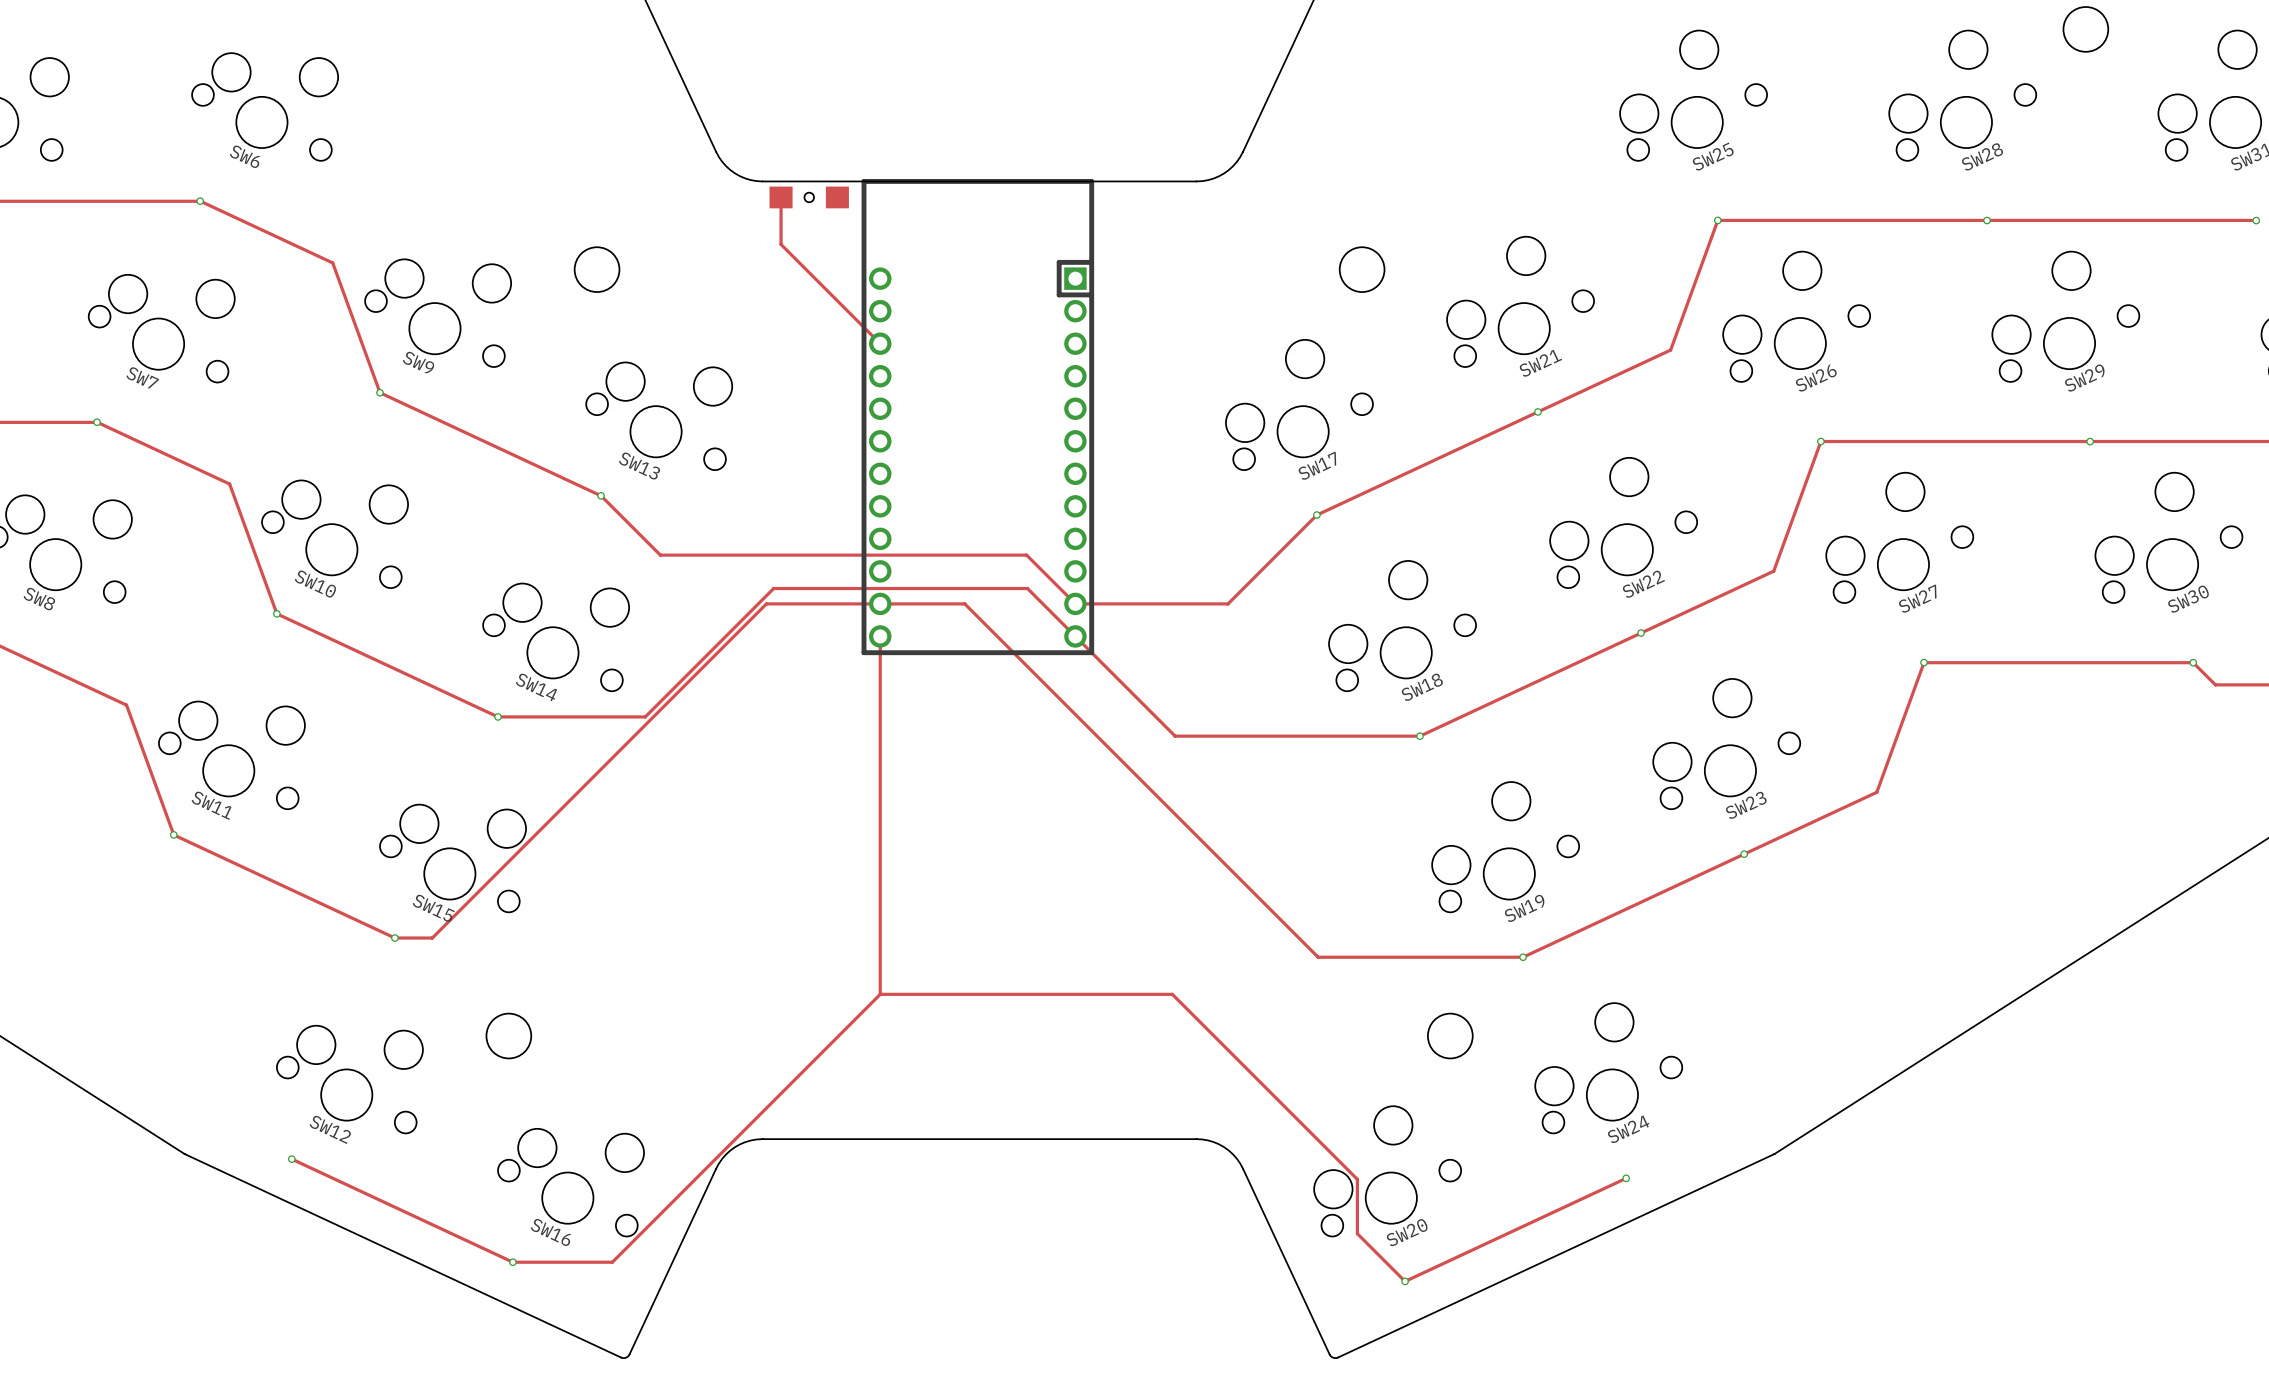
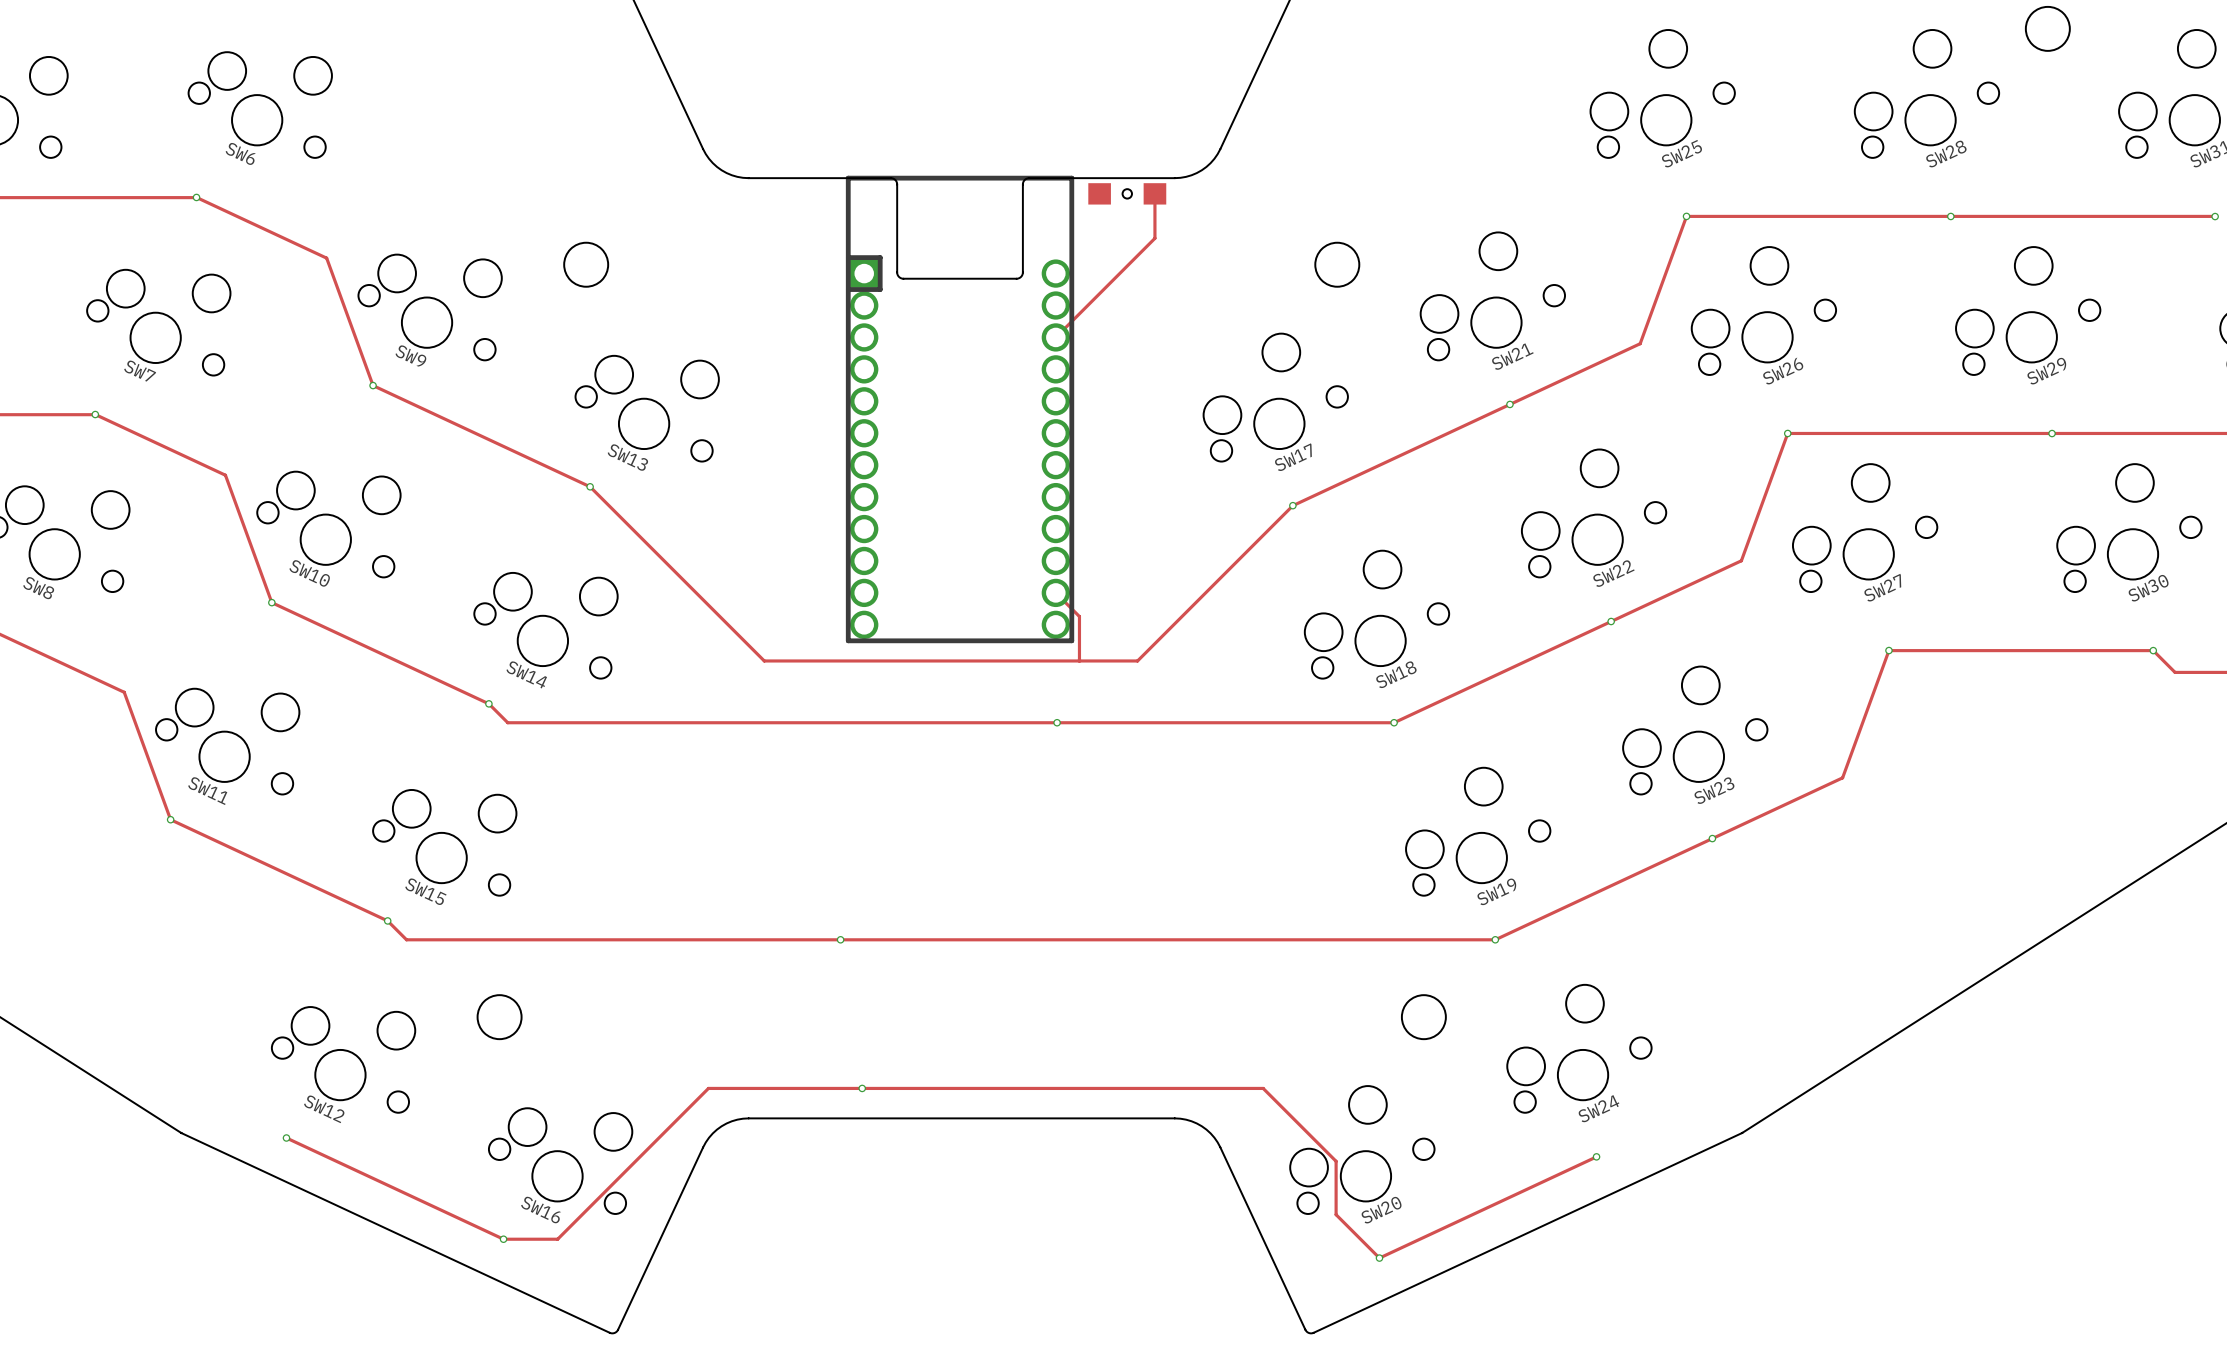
part footprint: [861, 179, 1095, 656] -> [845, 175, 1075, 644]
board edge: (907, 181) (1048, 181) -> (890, 178) (895, 179) (897, 183) (897, 273) (899, 276) (903, 278) (1020, 277) (1022, 272) (1022, 183) (1024, 179) (1029, 178)
track: (781, 197) (781, 244) (880, 343) -> none
part: (809, 197) -> none
part: none -> (1127, 193)
track: none -> (1154, 193) (1154, 238) (1055, 337)
track: (601, 495) (660, 555) (1026, 555) (1075, 603) (1228, 603) -> (590, 486) (764, 660) (1137, 660) (1205, 592)
track: none -> (1055, 592) (1079, 616) (1079, 660)
track: (880, 636) (880, 994) -> none
track: (497, 716) (645, 716) (773, 588) (1027, 588) (1175, 736) -> (488, 703) (507, 722) (1153, 722)
via: none -> (1057, 722)
track: (394, 938) (432, 938) (766, 603) (964, 603) (1318, 957) -> (387, 920) (406, 939) (1294, 939)
via: none -> (840, 939)
track: (880, 994) (1172, 994) (1357, 1179) (1357, 1233) (1405, 1281) -> (557, 1239) (708, 1088) (1263, 1088) (1336, 1161) (1336, 1214) (1379, 1258)
track: (880, 994) (612, 1262) (568, 1262) -> none
via: none -> (862, 1088)

